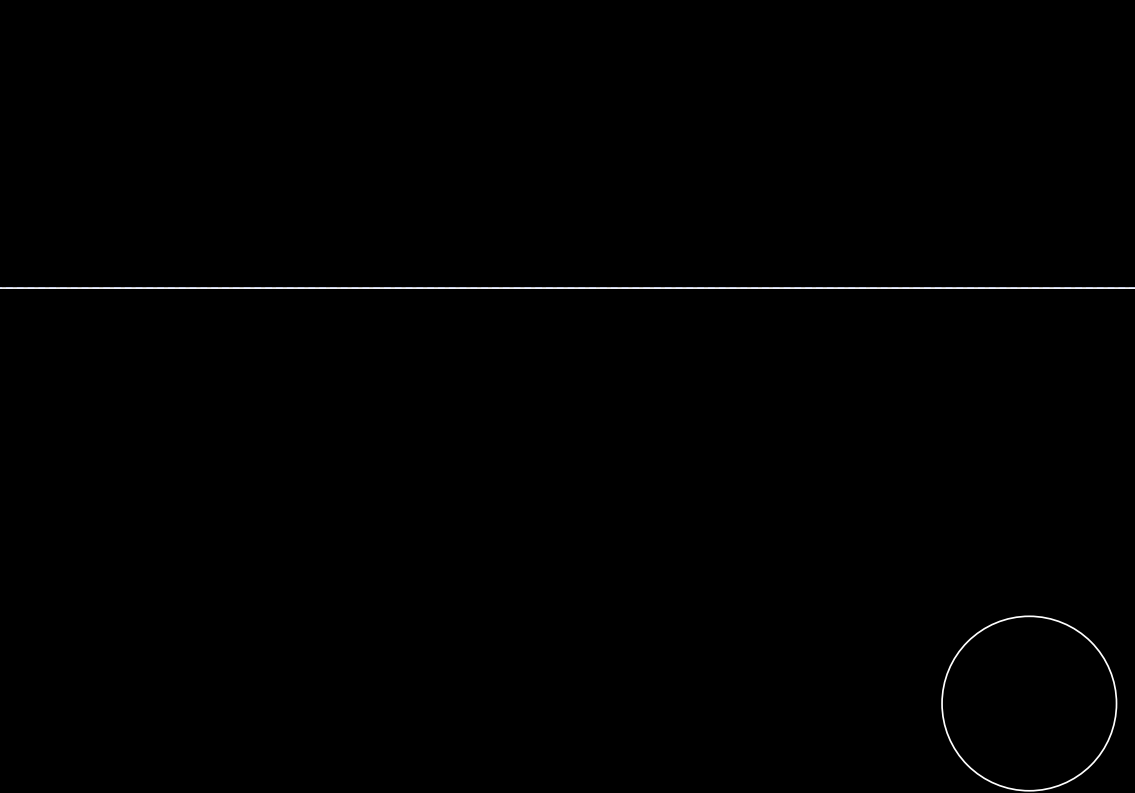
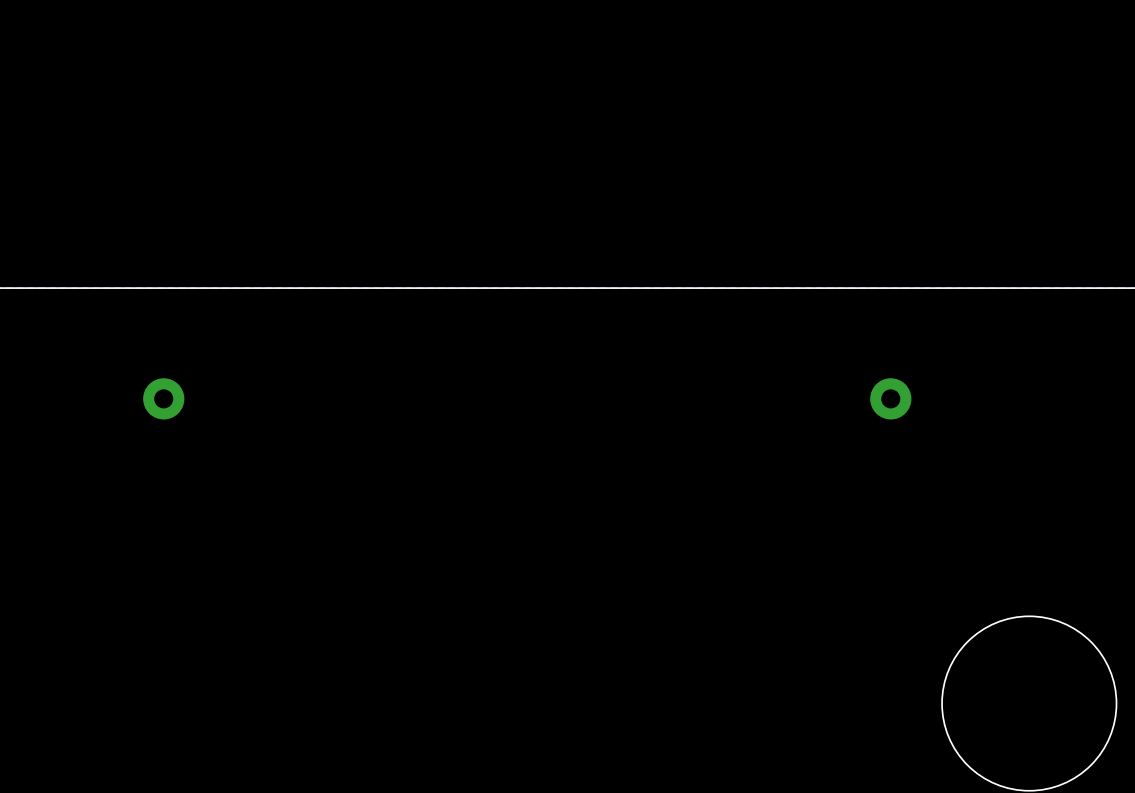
via: none -> (163, 398)
via: none -> (890, 398)

